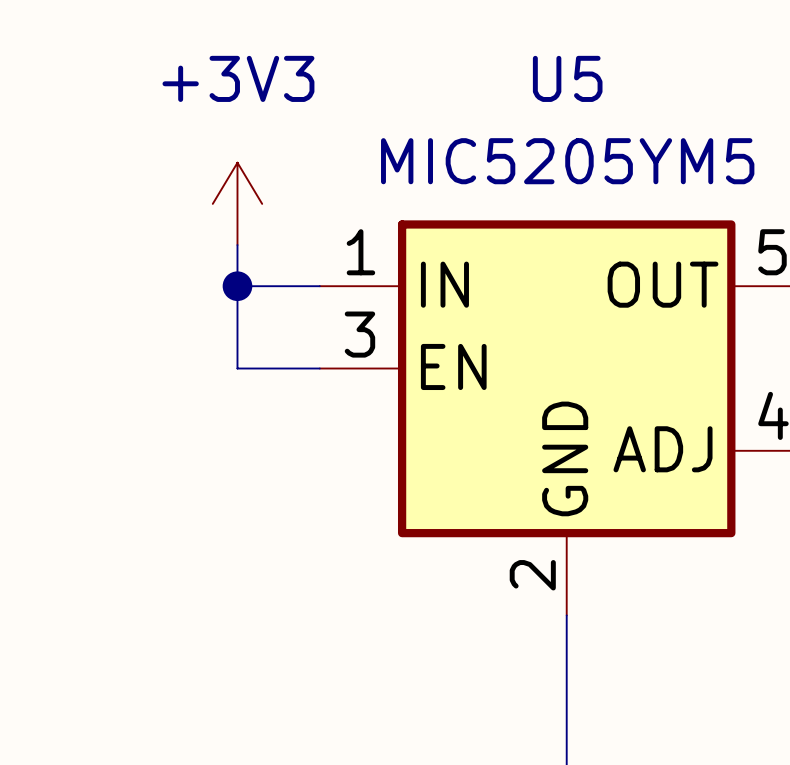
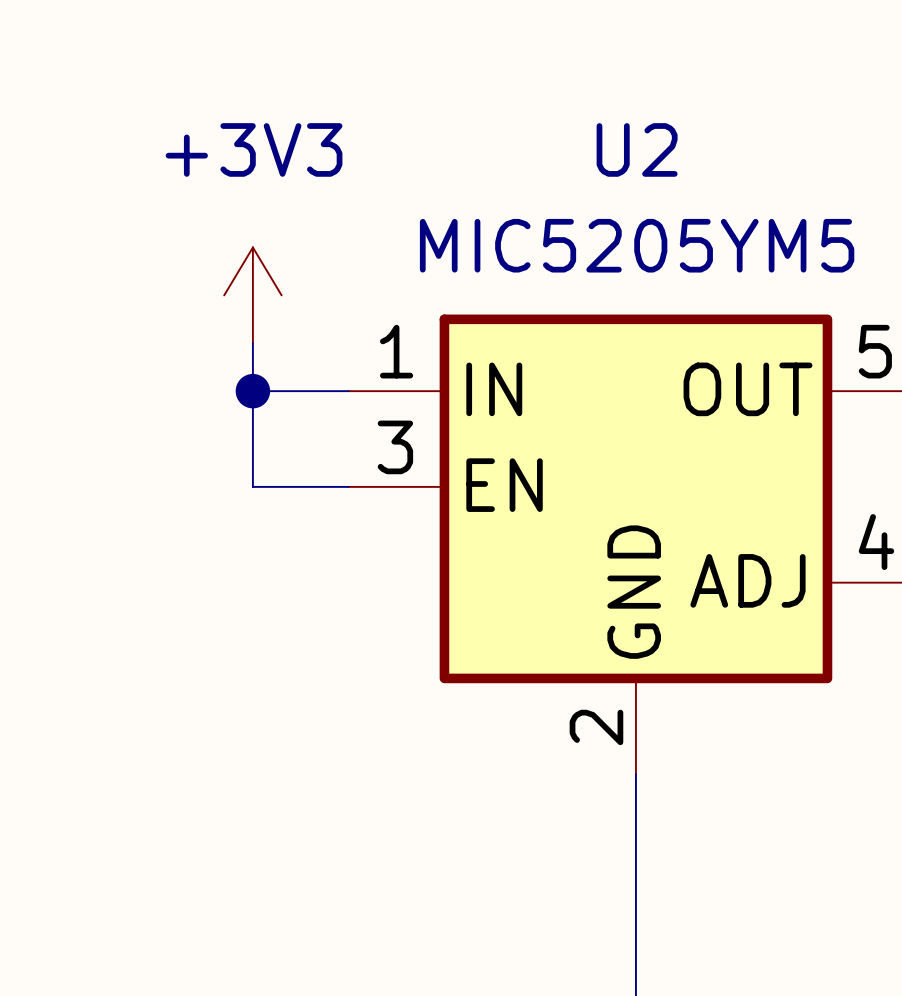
U5 name: U5 (567, 78) -> U2 (637, 149)

